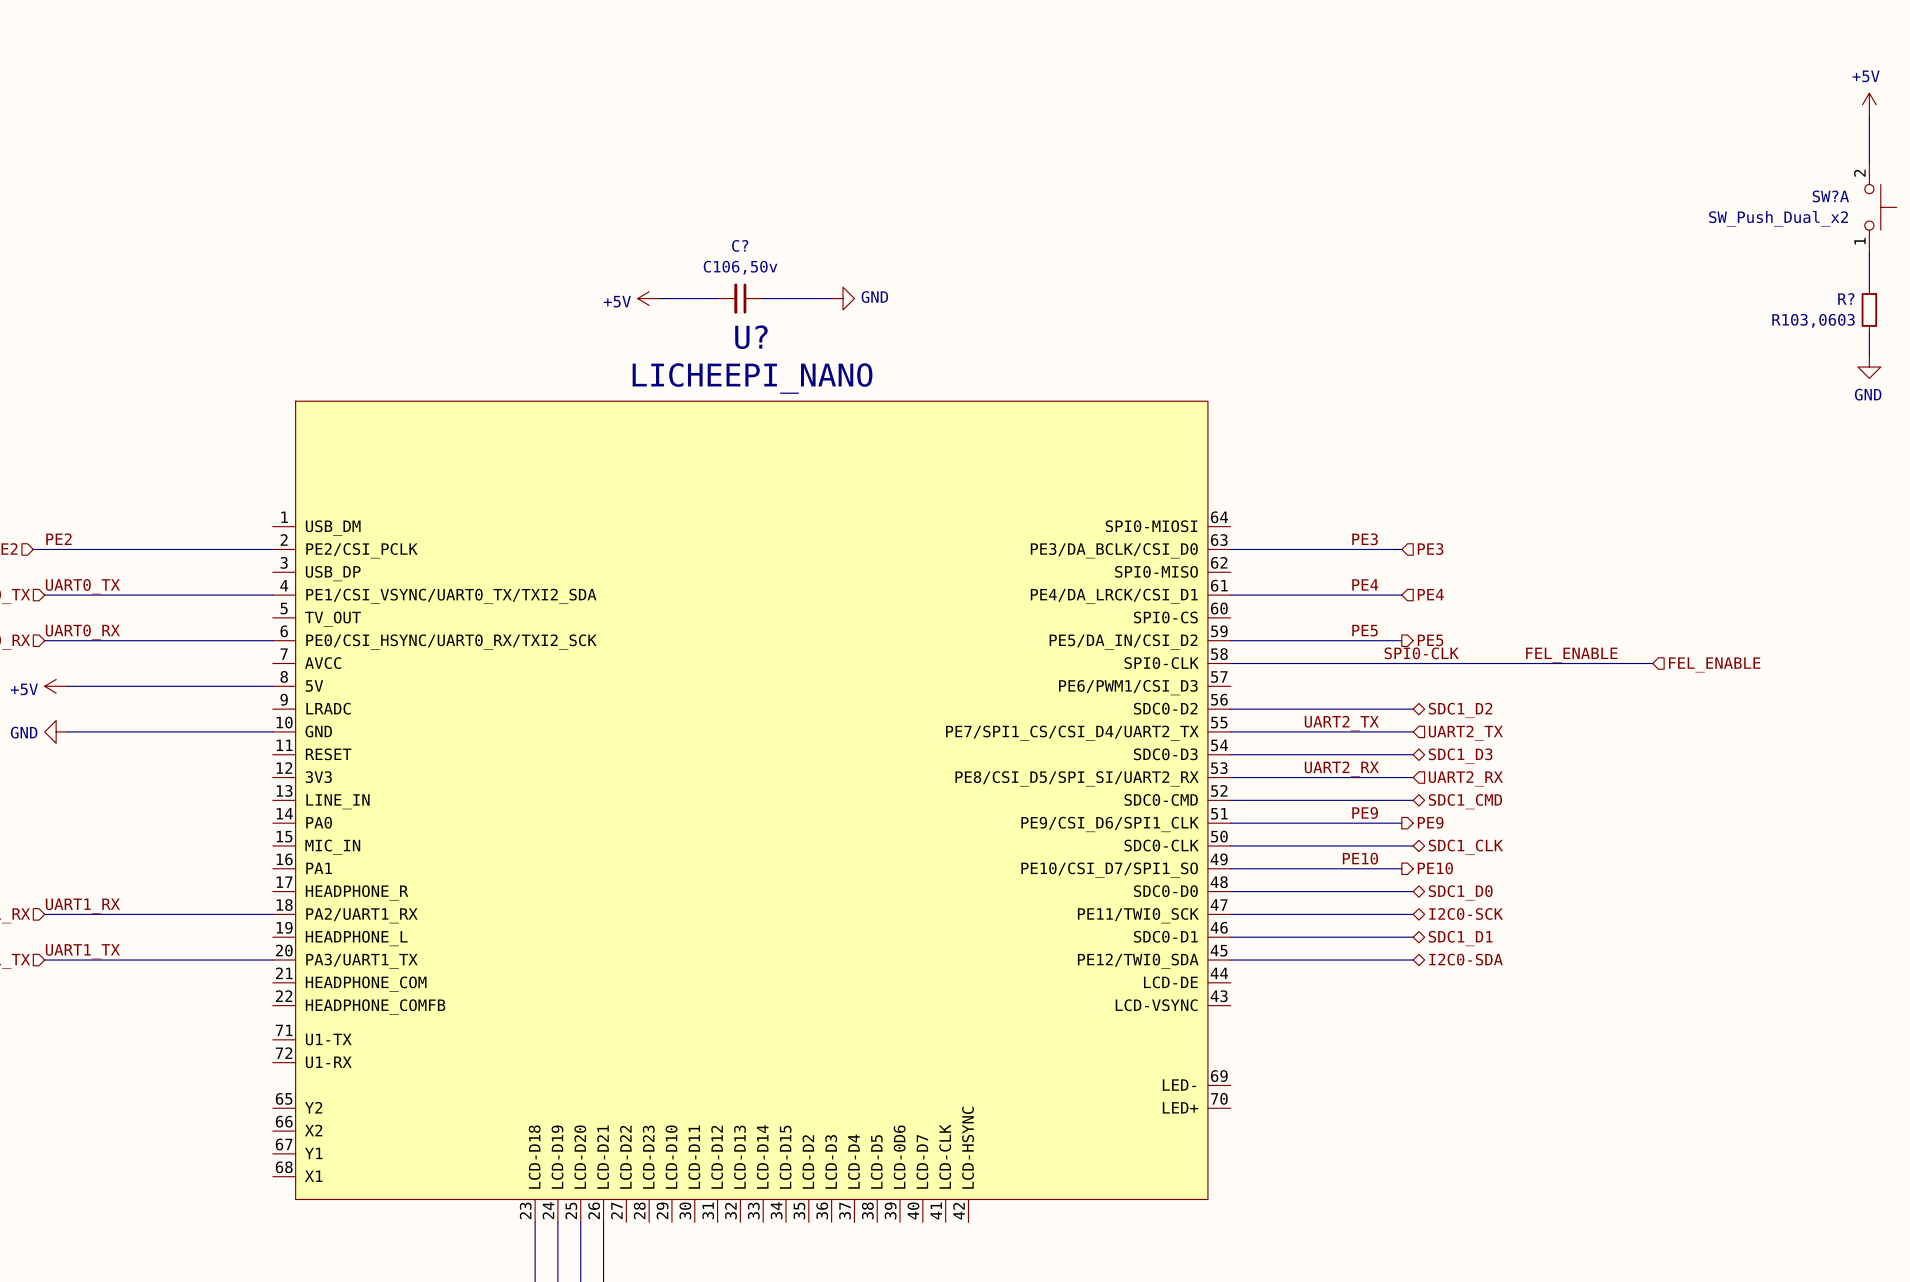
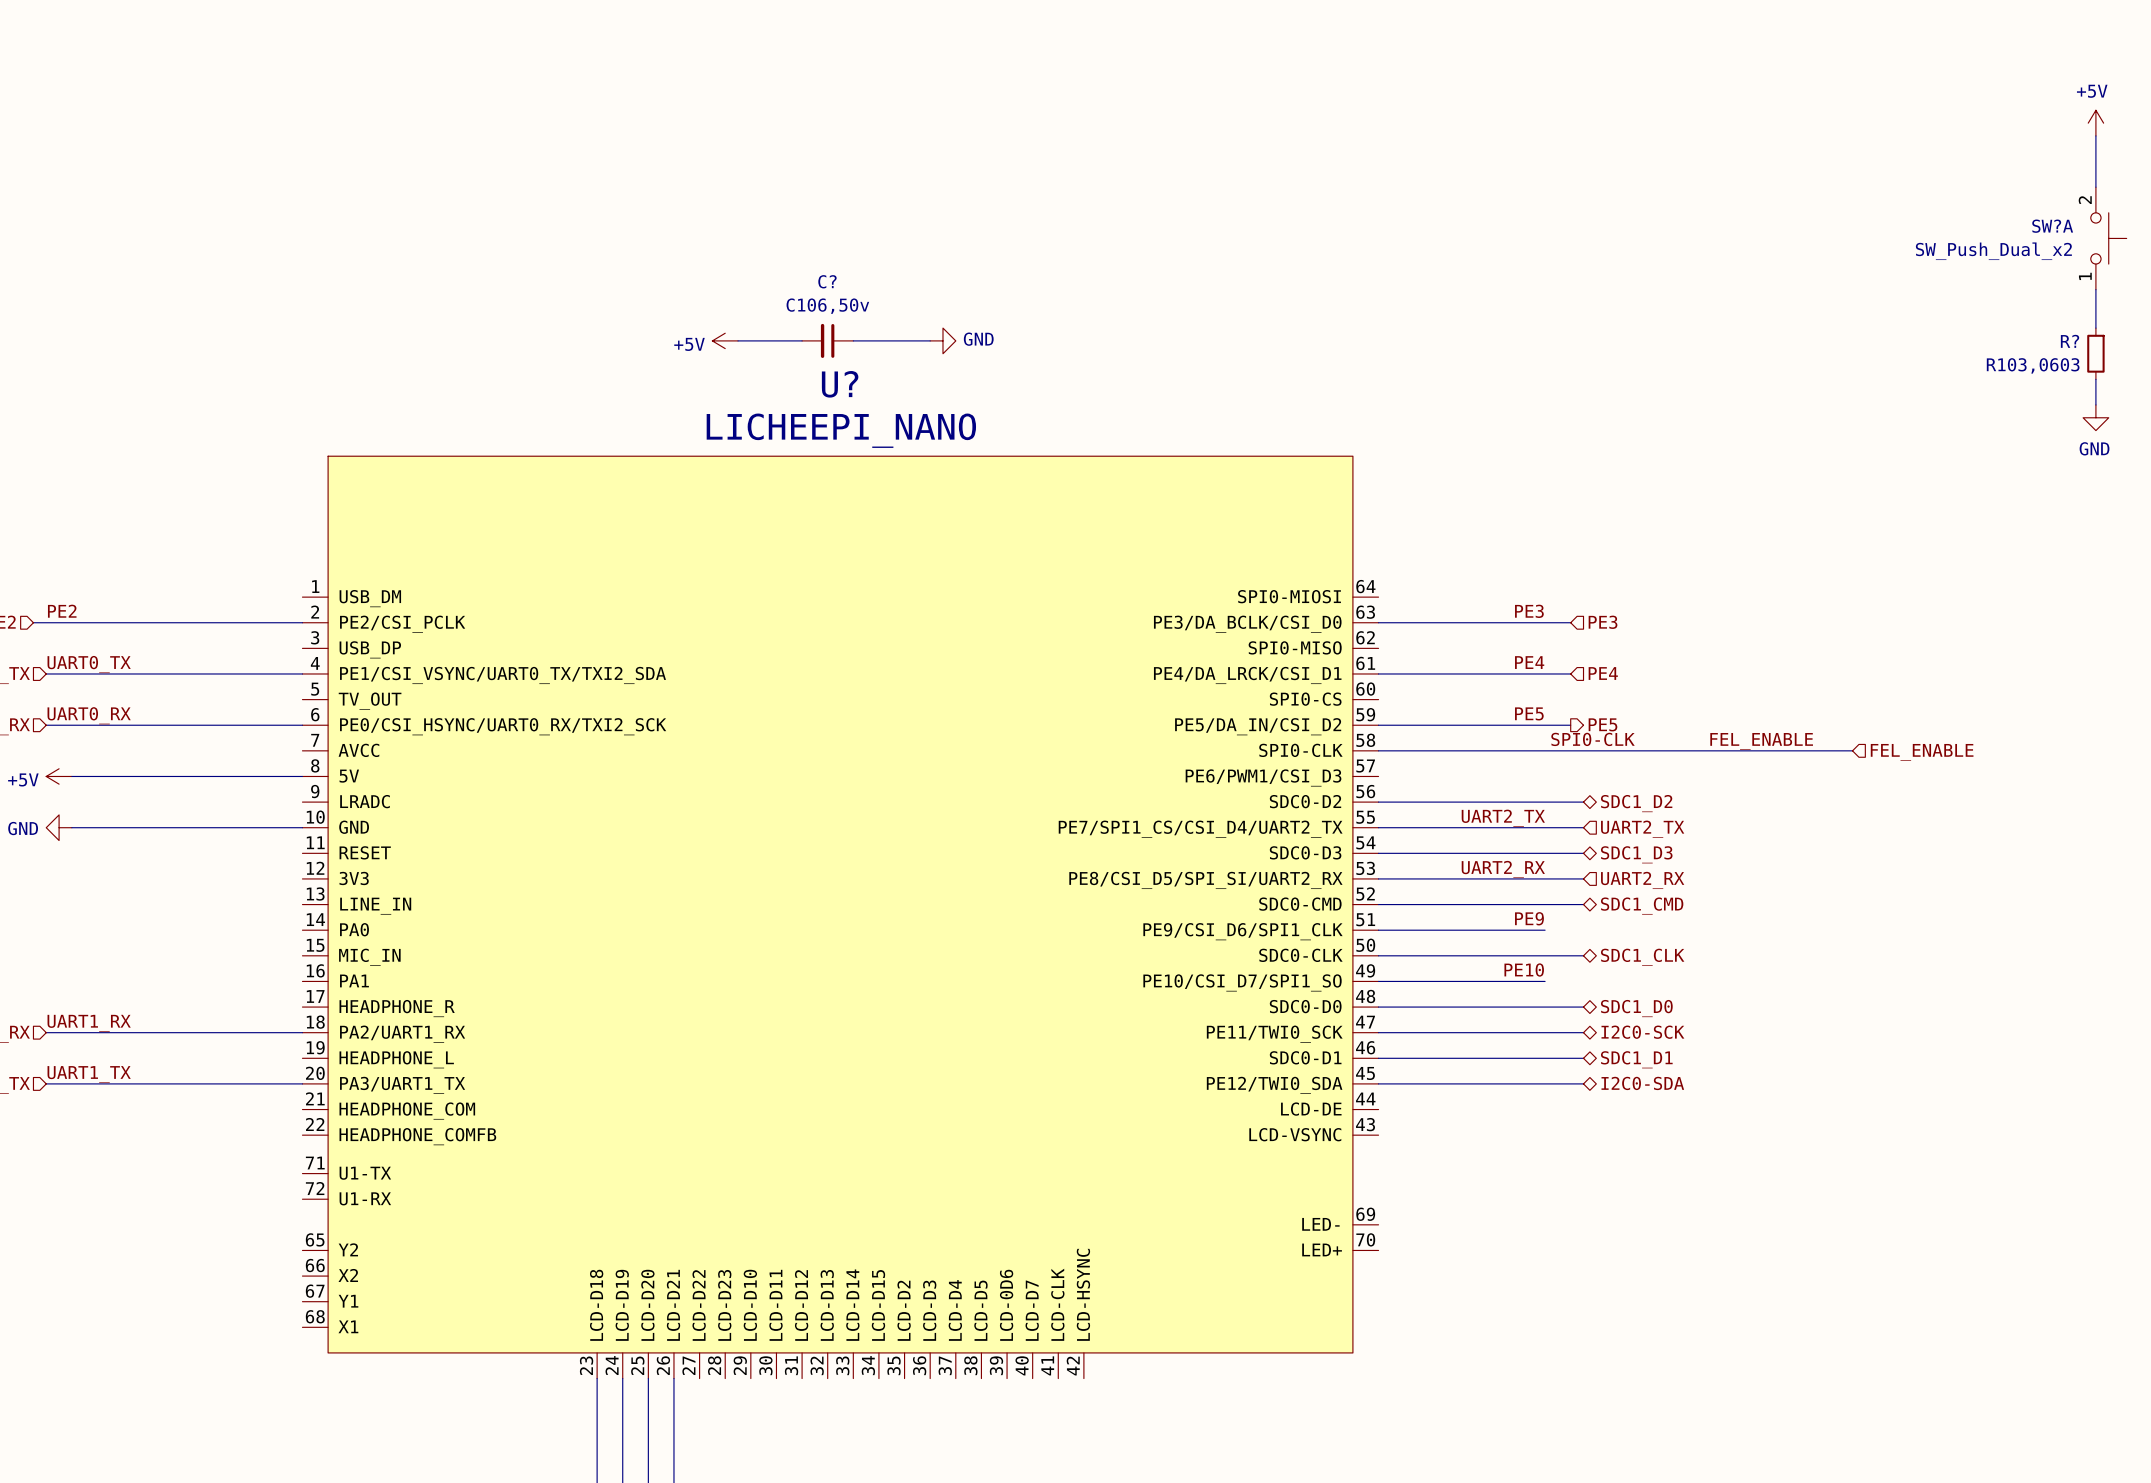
hierarchical label: PE9 (1430, 822) -> none
wire: (1379, 823) (1401, 823) -> none
wire: (1379, 868) (1401, 868) -> none
hierarchical label: PE10 (1435, 868) -> none

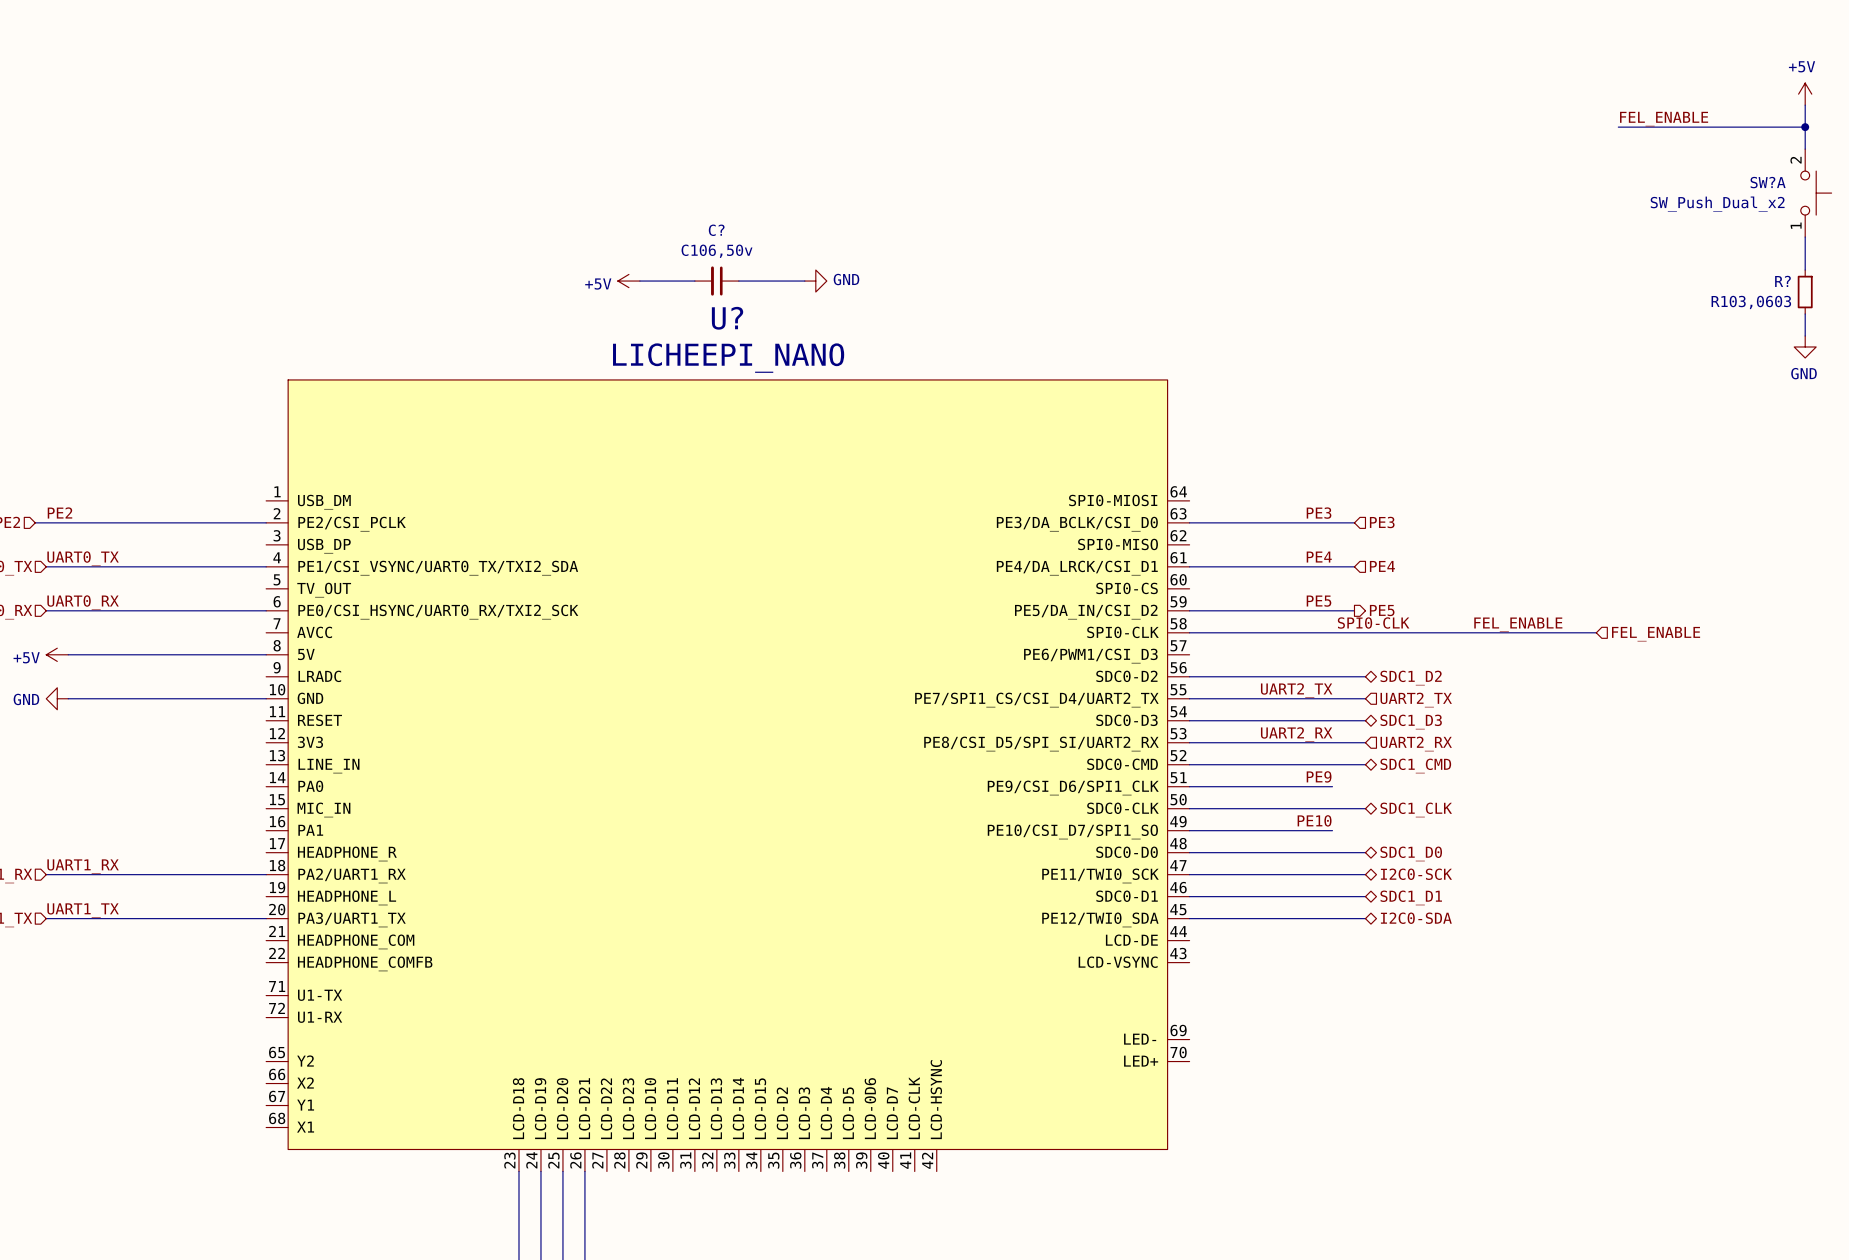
label: none -> FEL_ENABLE (1664, 119)
wire: none -> (1618, 127) (1805, 127)
junction: none -> (1805, 127)

